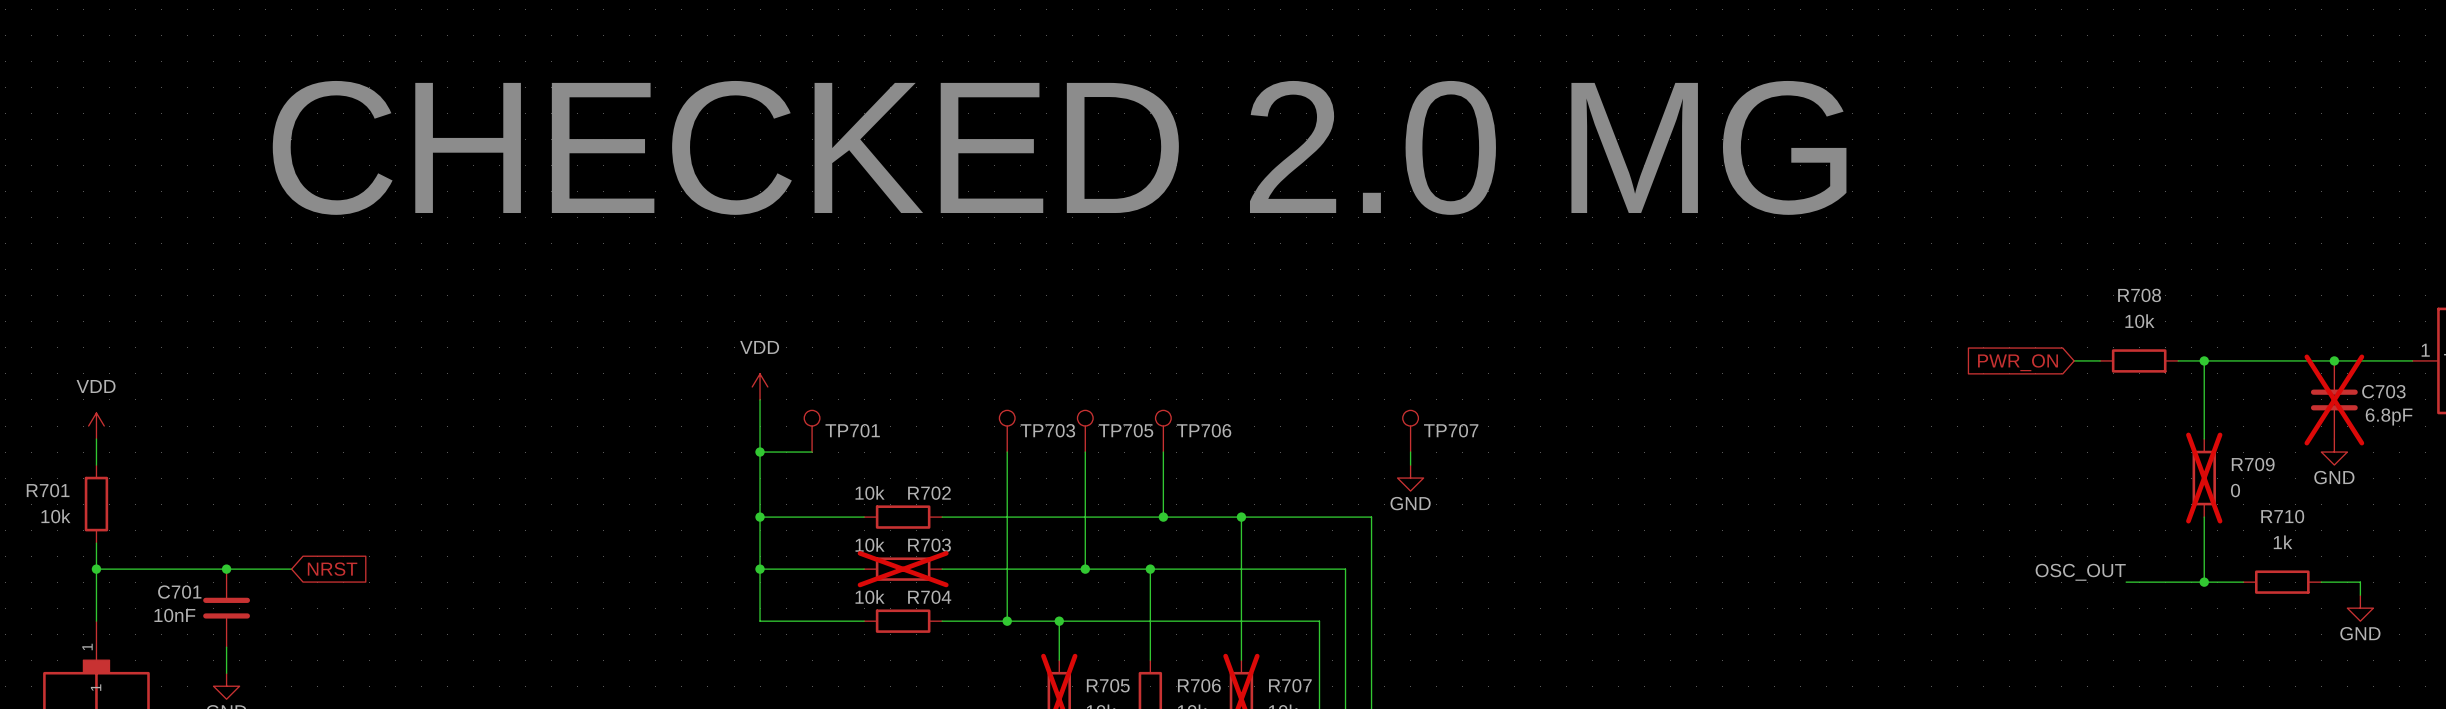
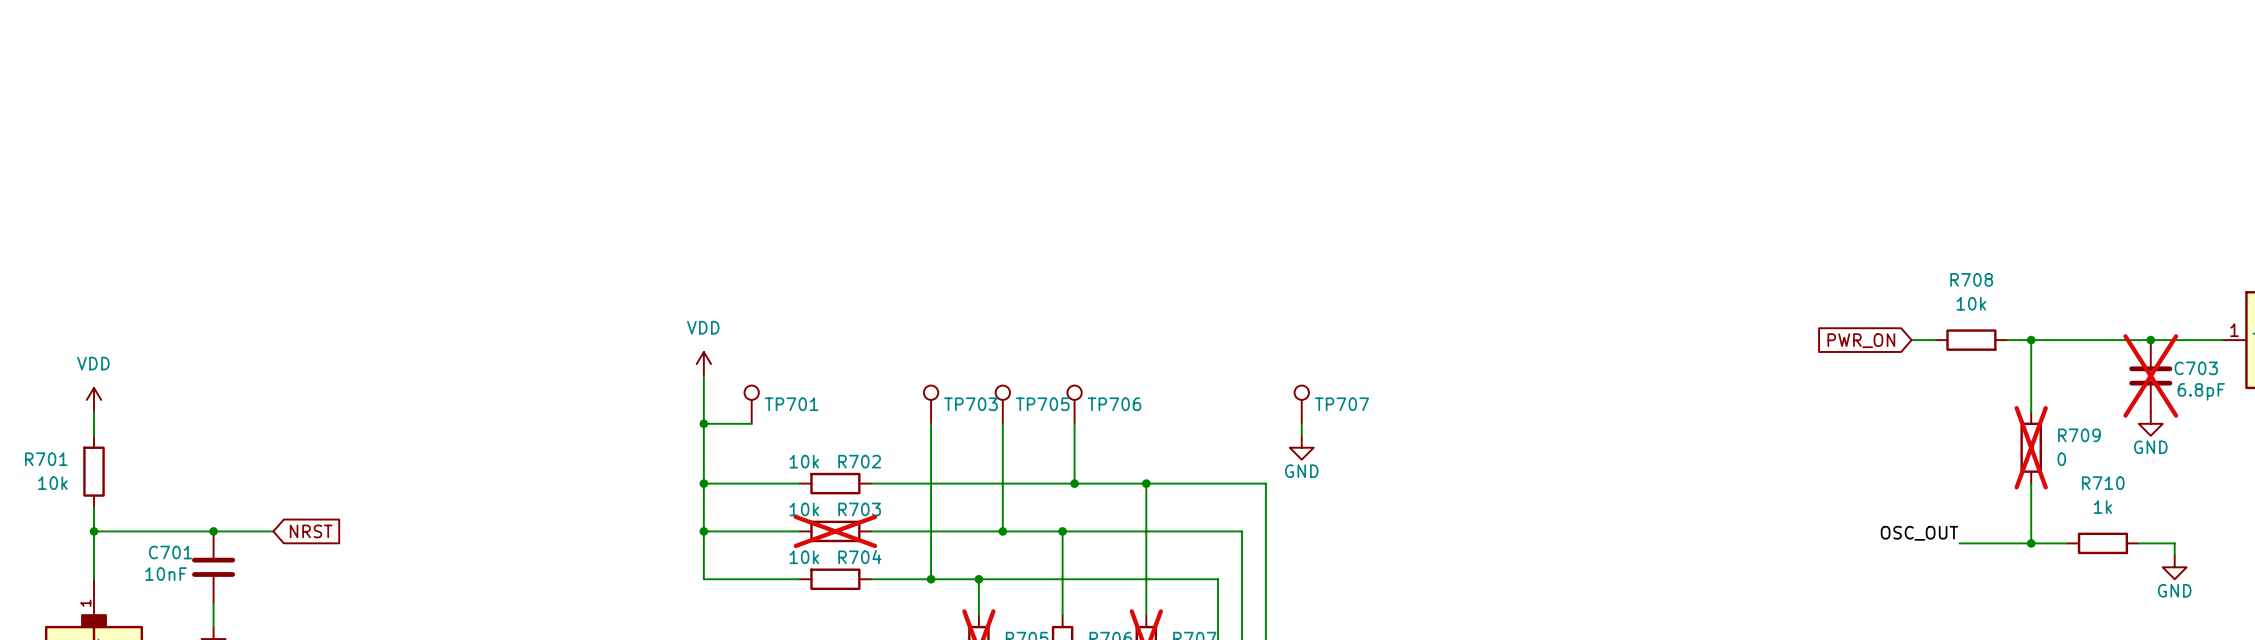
text: CHECKED 2.0 MG (1059, 147) -> none

